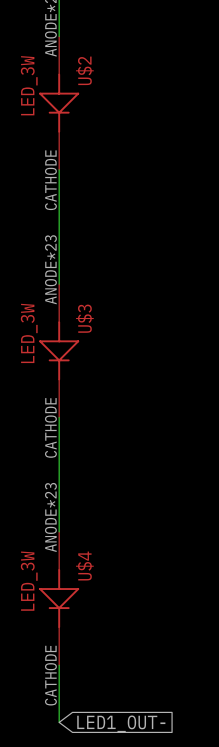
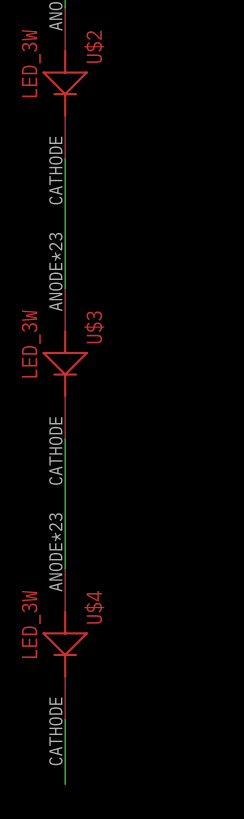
global label: LED1_OUT- (121, 723) -> none

